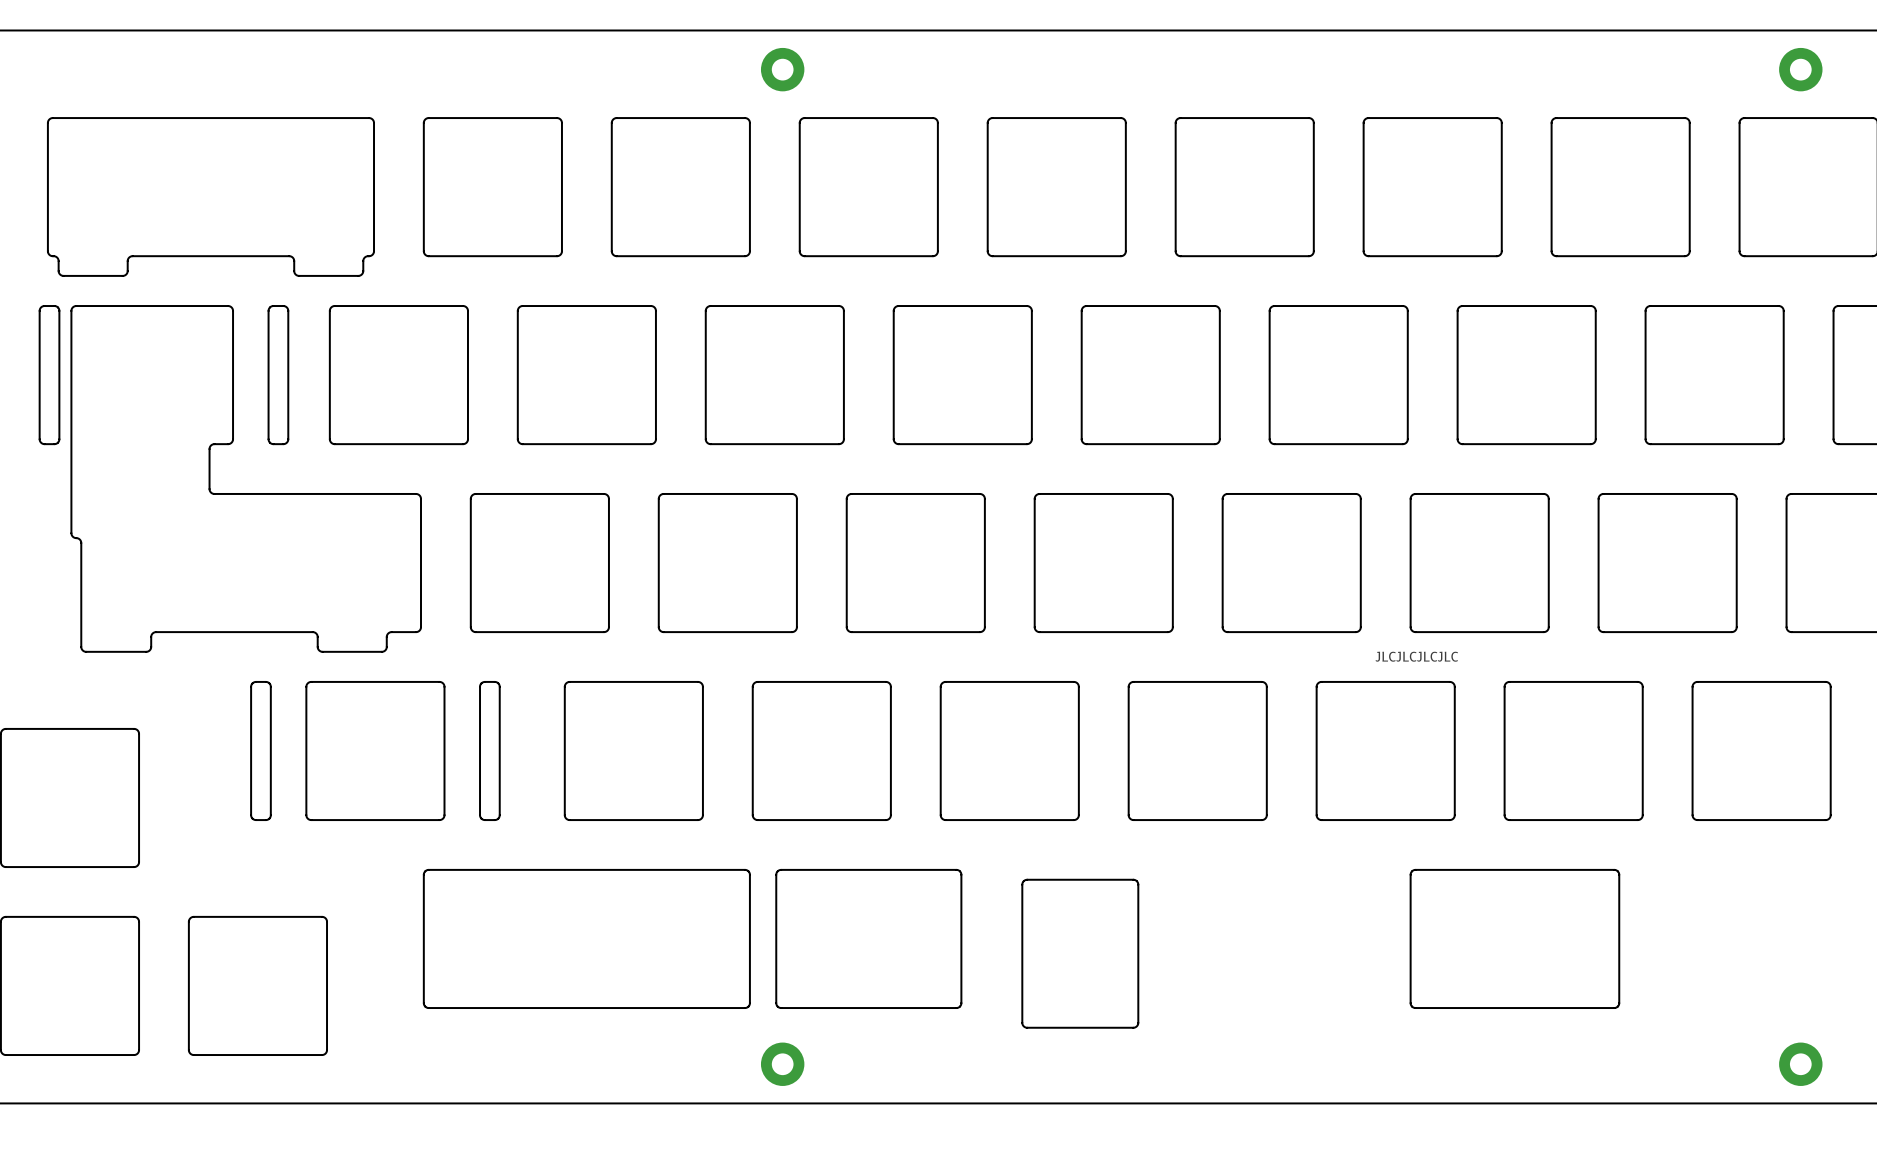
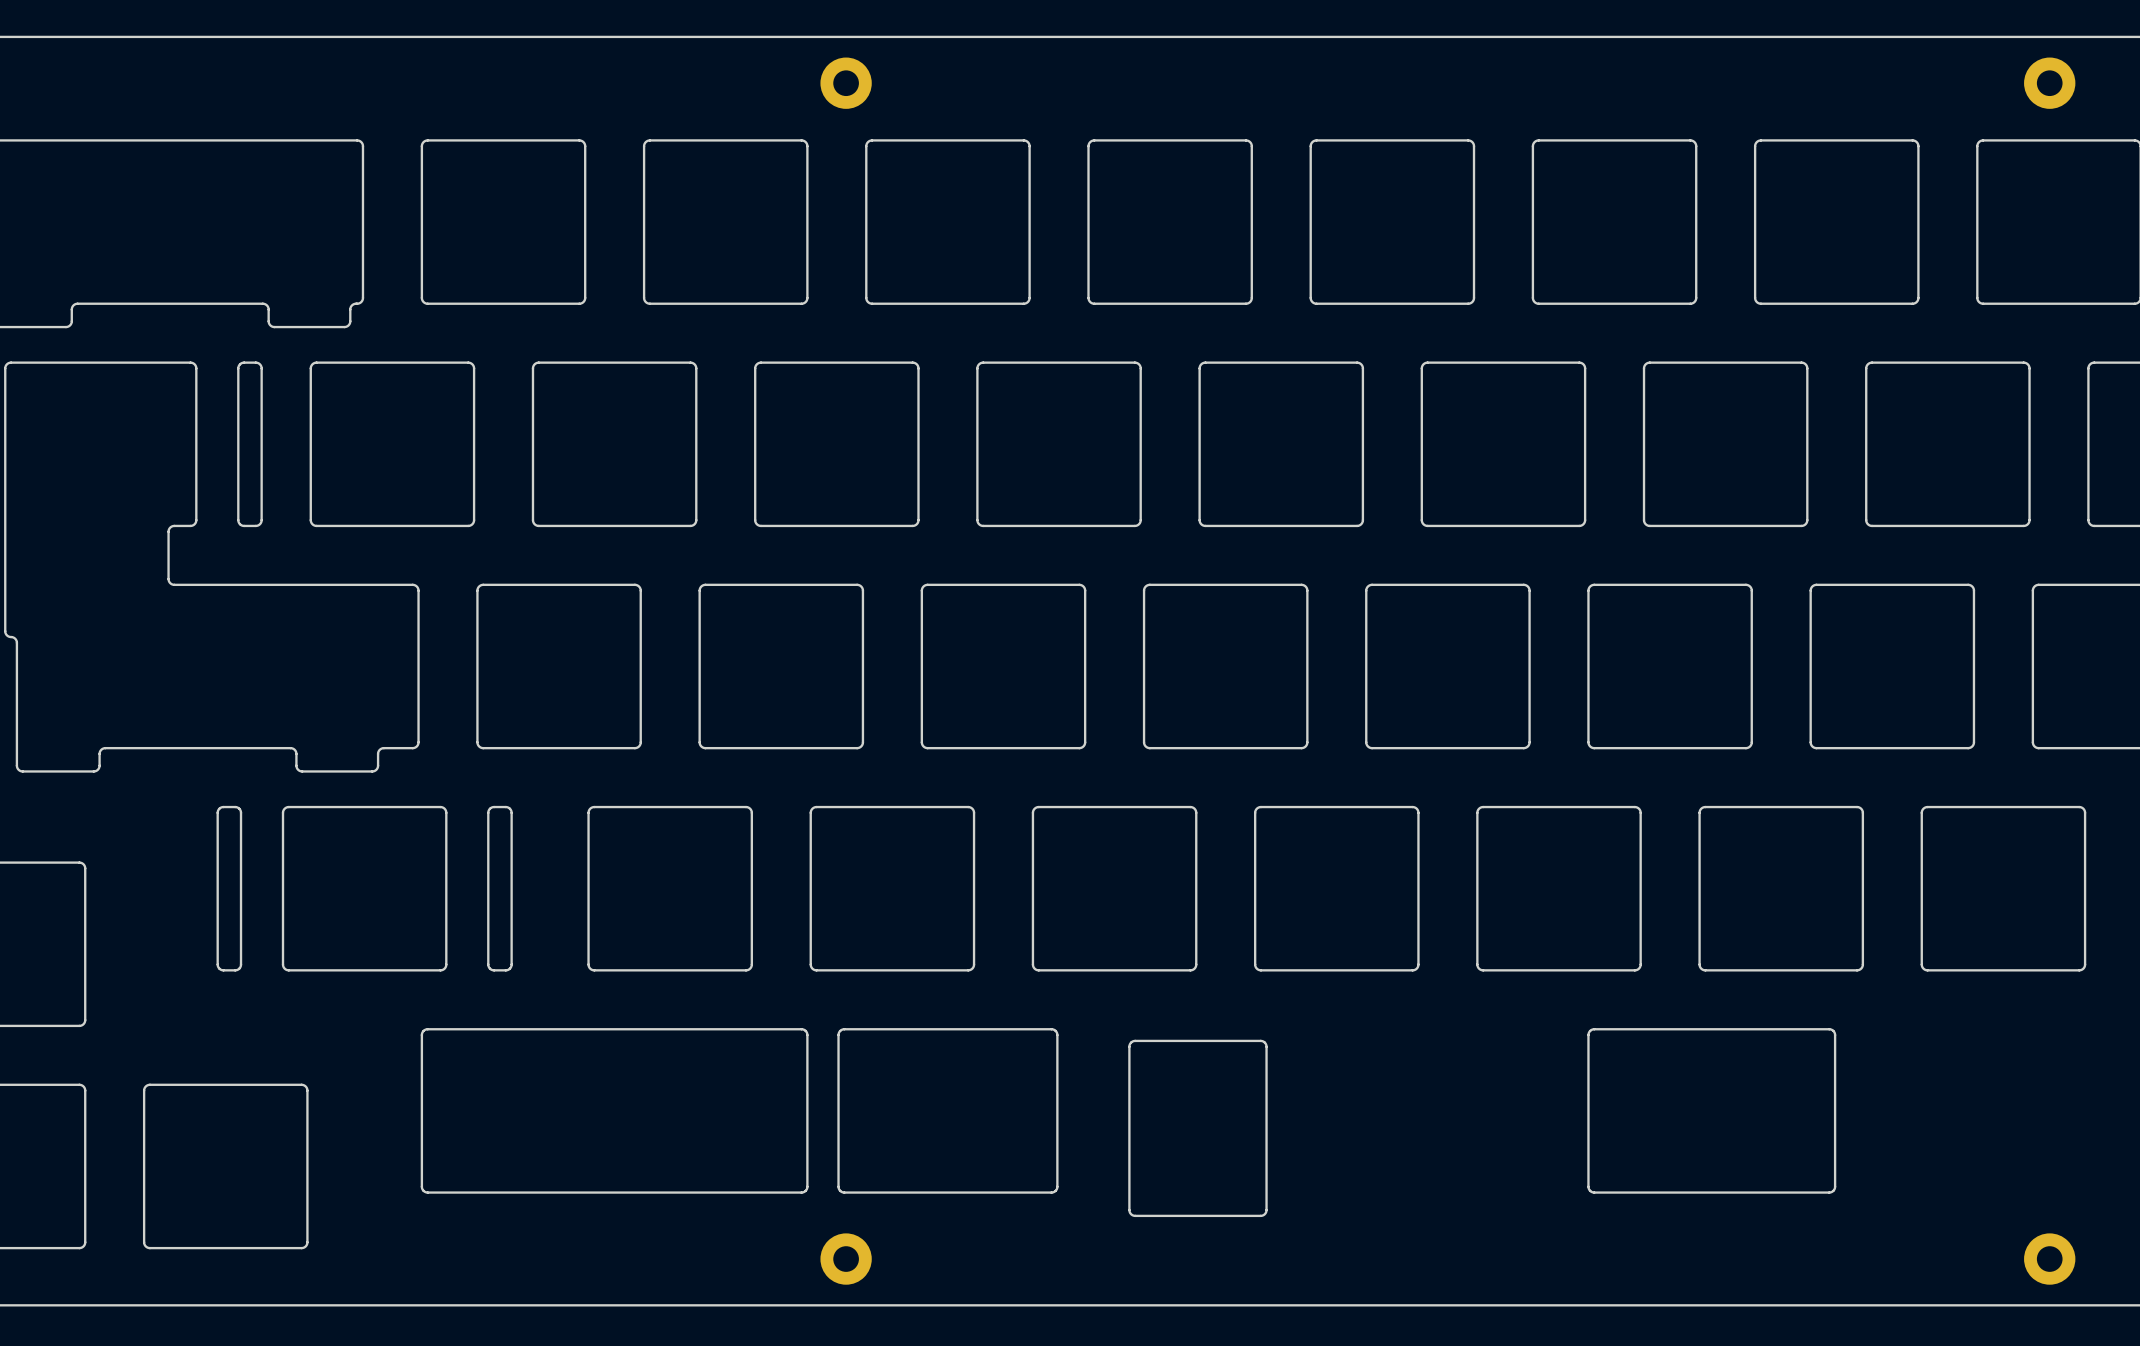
text: JLCJLCJLCJLC (1416, 656) -> none

